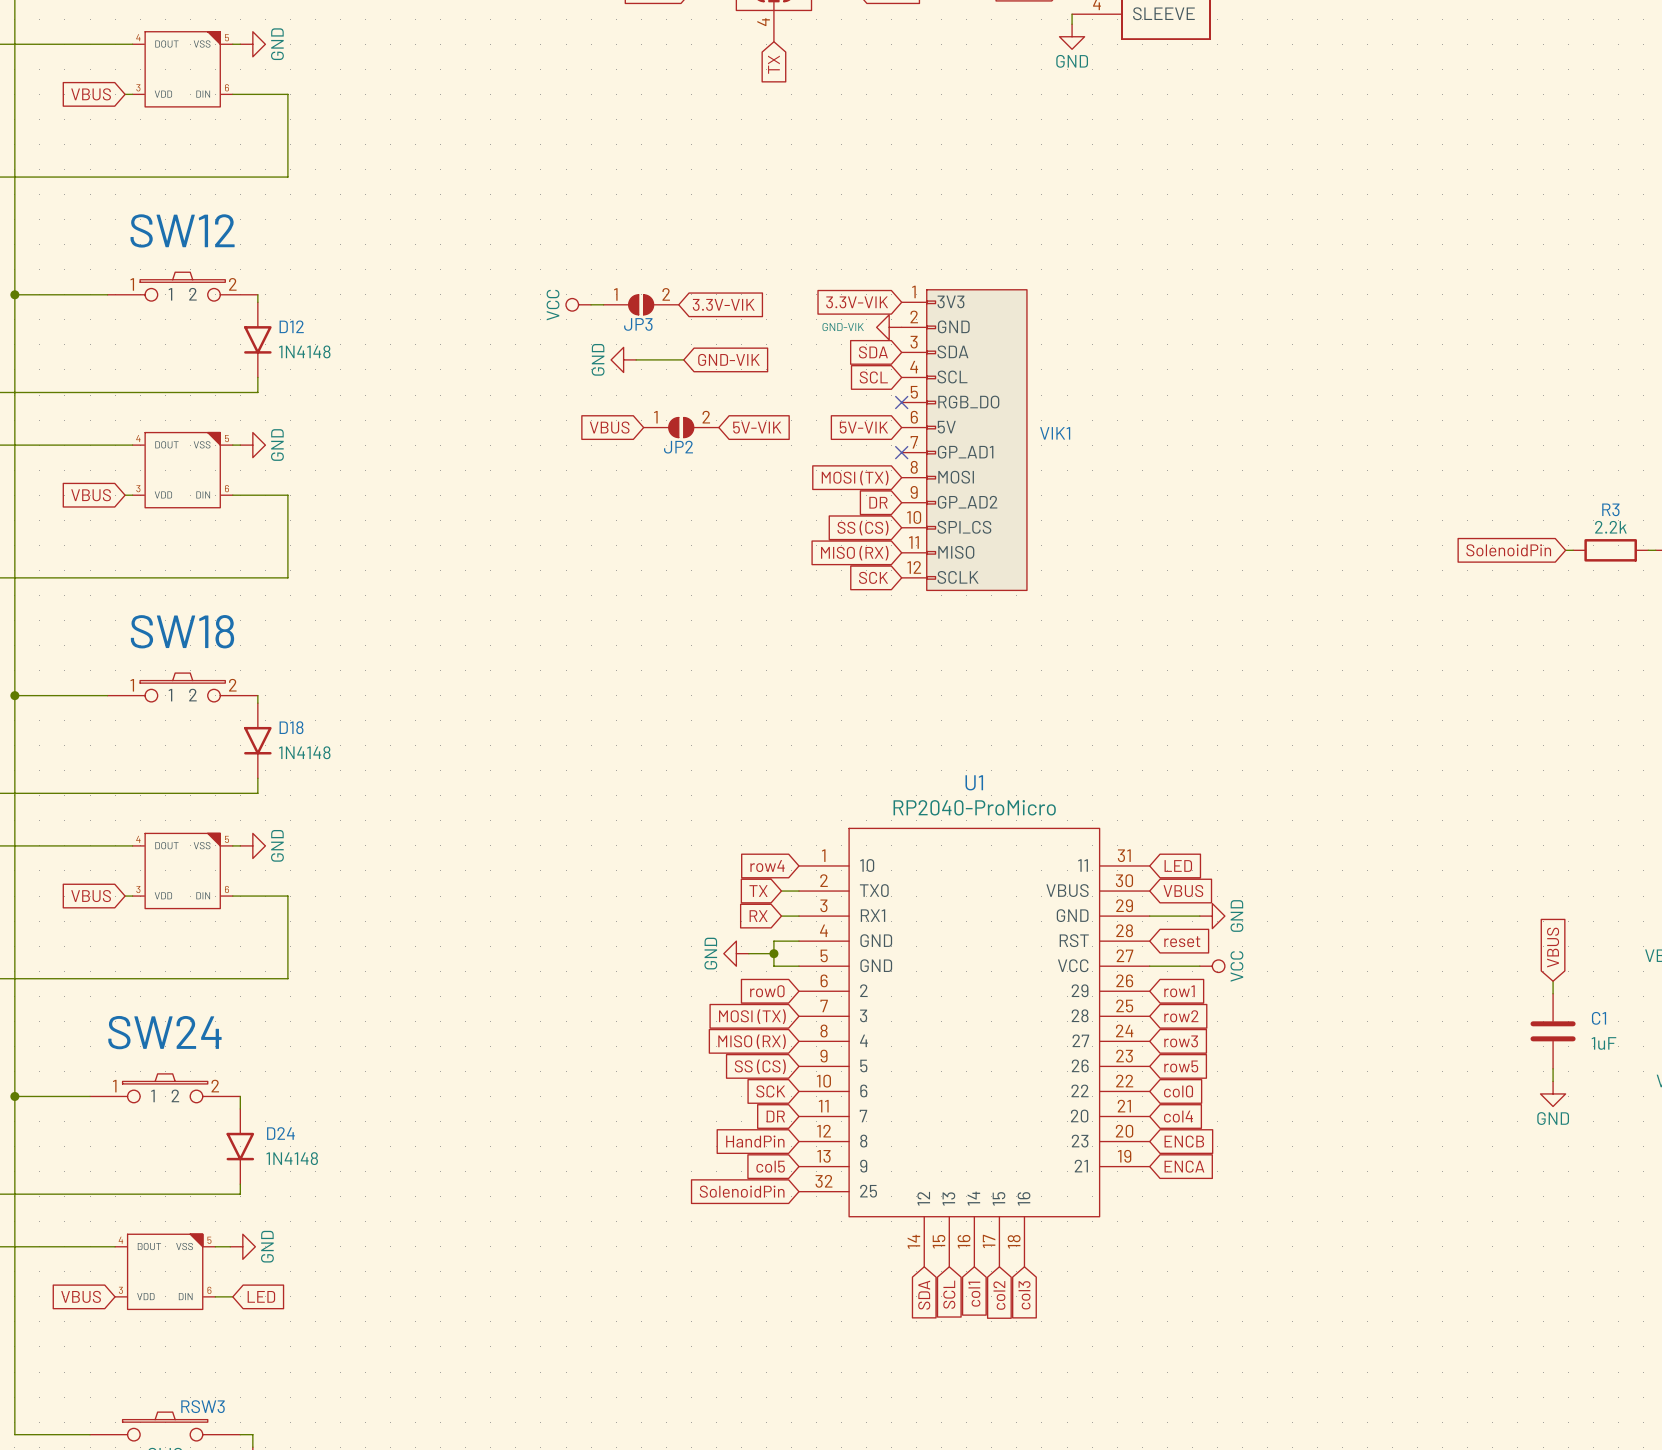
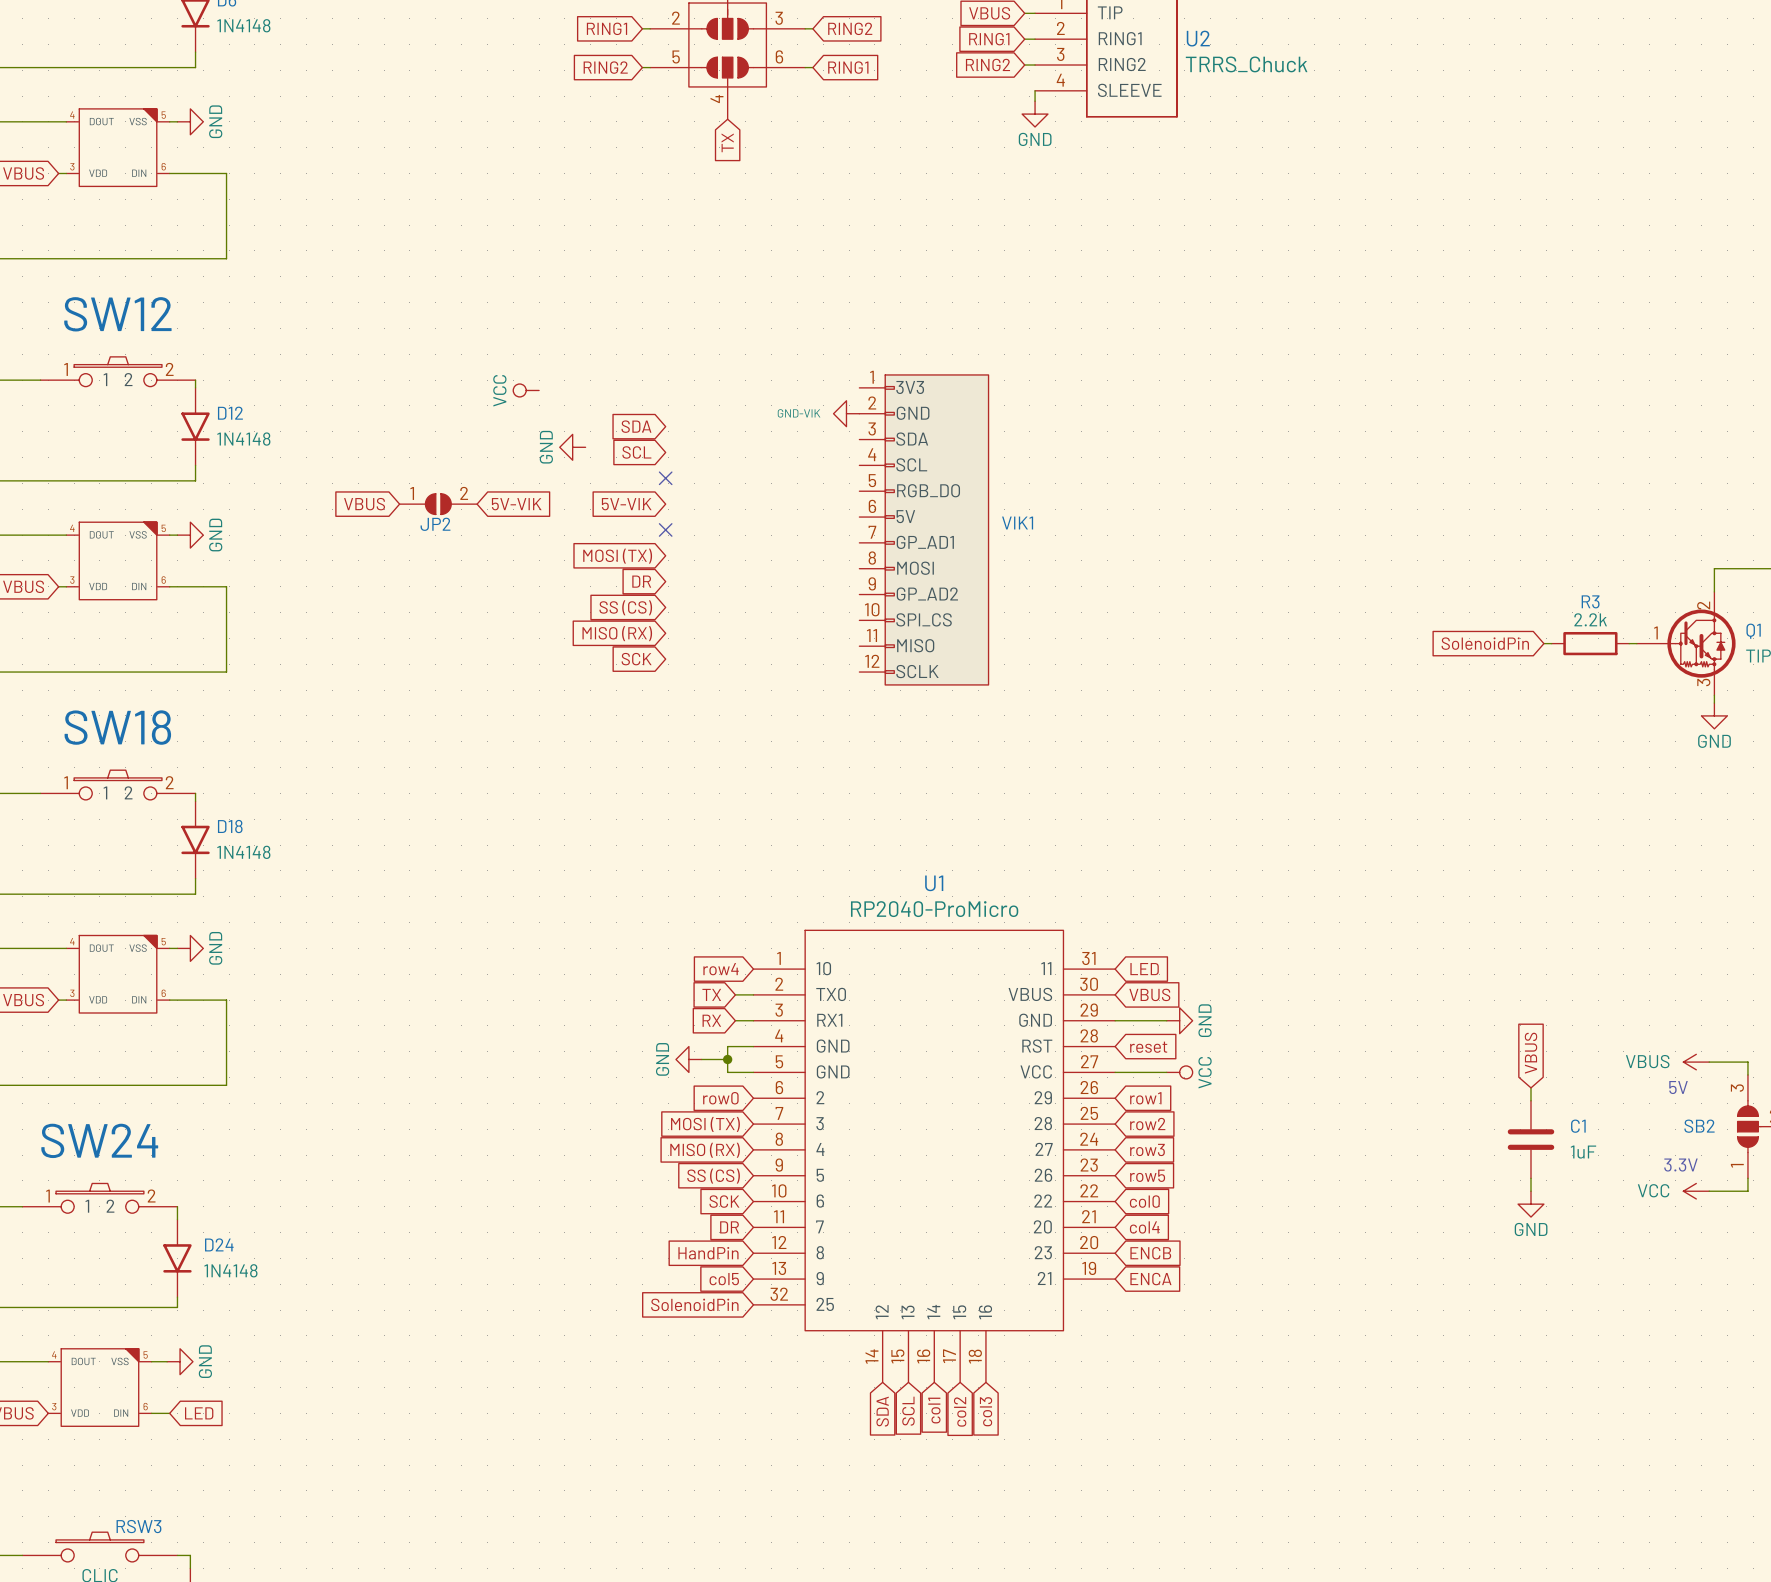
global label: 3.3V-VIK (857, 302) -> none
wire: (591, 304) (603, 304) -> none
JP3: (641, 304) -> none
global label: 3.3V-VIK (723, 304) -> none
global label position: SDA (873, 352) -> SDA (636, 426)
wire: (636, 359) (683, 359) -> none
global label: GND-VIK (728, 359) -> none
global label position: SCL (873, 377) -> SCL (636, 452)
no-connect mark: none -> (665, 478)
no-connect mark: (901, 402) -> none
global label: none -> 5V-VIK (516, 504)
global label position: VBUS (609, 427) -> VBUS (364, 504)
JP2 position: (681, 427) -> (438, 504)
global label rotation: 0° (757, 427) -> 180° (626, 504)
global label position: 5V-VIK (757, 427) -> 5V-VIK (626, 504)
global label: 5V-VIK (863, 427) -> none
no-connect mark: none -> (665, 529)
no-connect mark: (901, 452) -> none
global label position: MOSI (TX) (855, 478) -> MOSI (TX) (617, 556)
global label position: DR (878, 502) -> DR (641, 581)
global label position: SS (CS) (863, 528) -> SS (CS) (625, 607)
global label position: MISO (RX) (854, 553) -> MISO (RX) (617, 633)
global label position: SCK (873, 577) -> SCK (636, 659)

